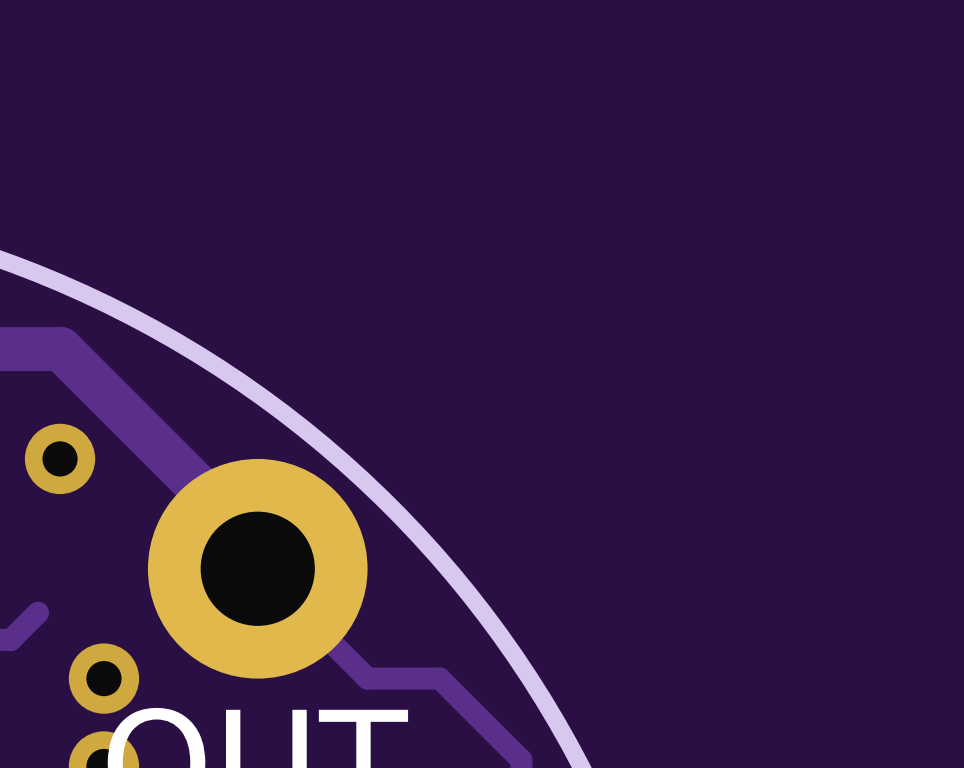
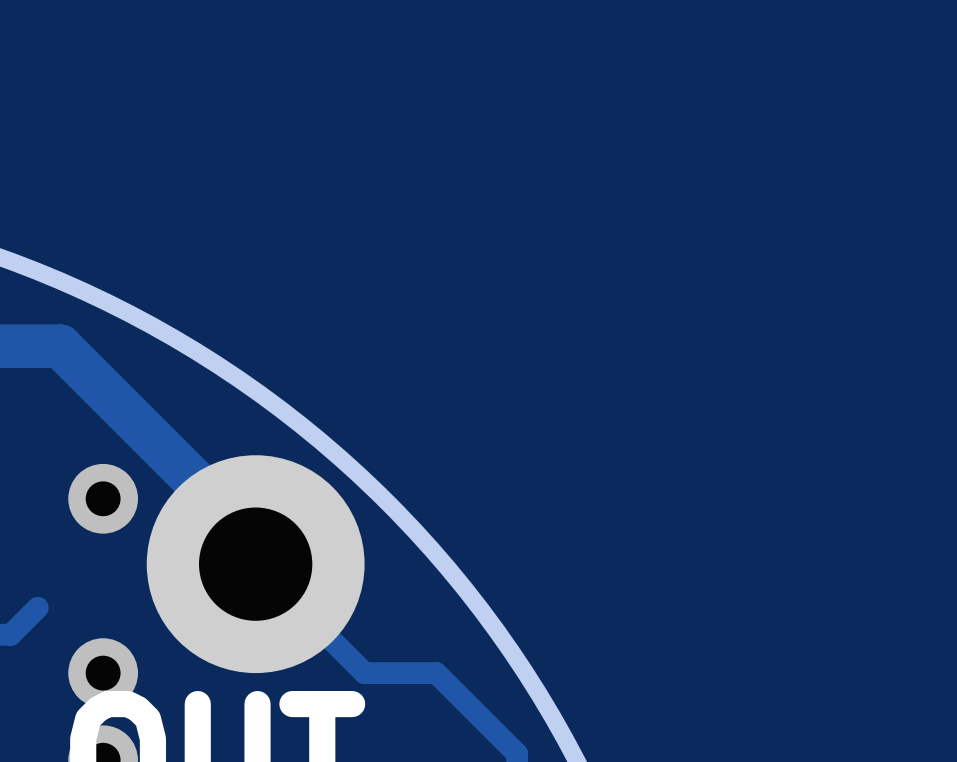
via position: (60, 458) -> (103, 498)

